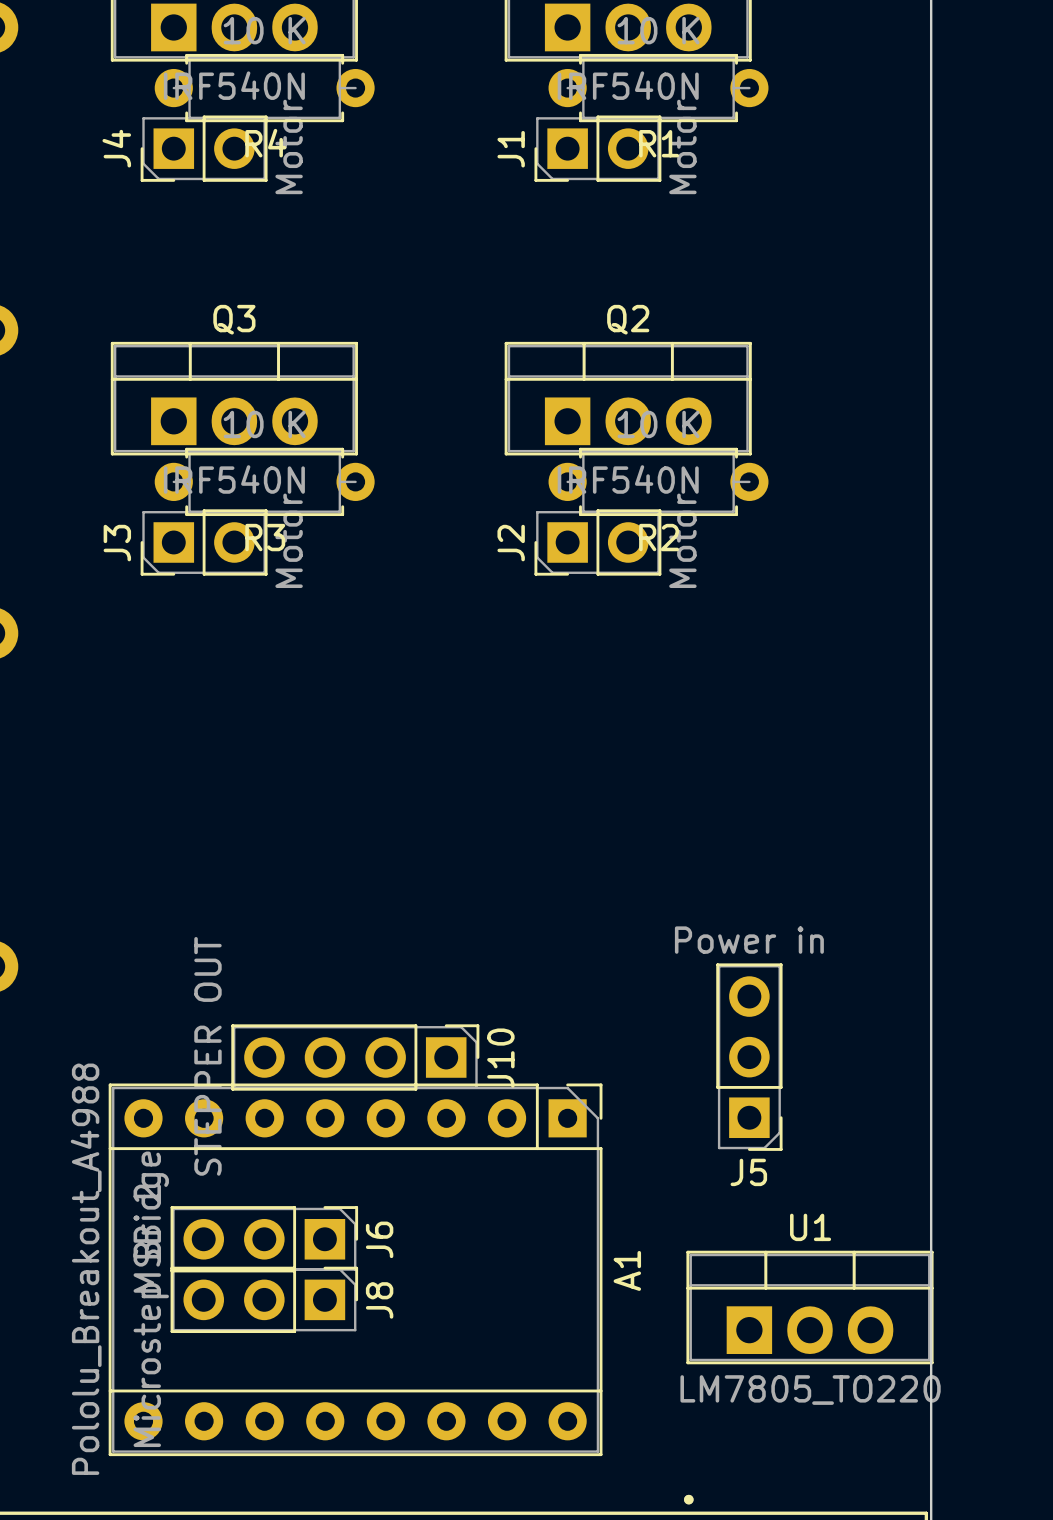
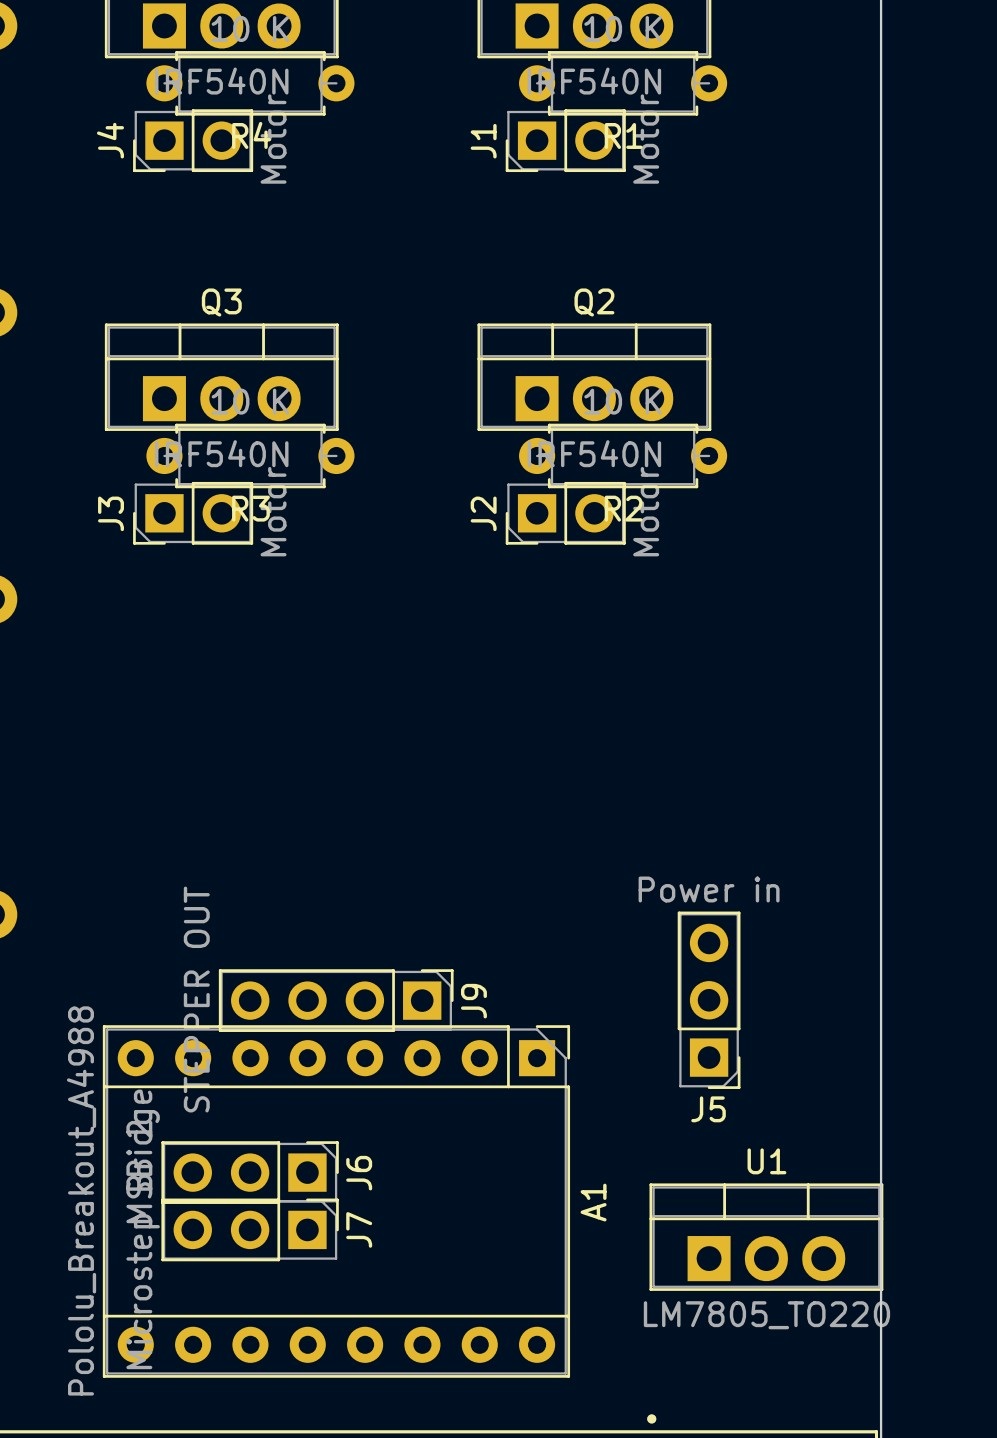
J10 name: J10 (500, 1058) -> J9 (473, 1001)
J8 name: J8 (379, 1300) -> J7 (359, 1229)

